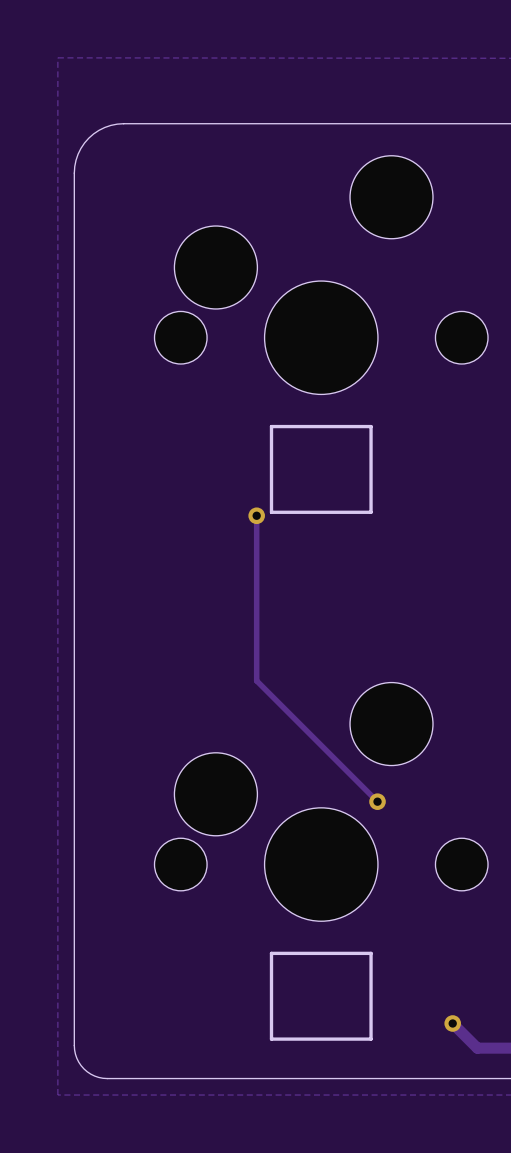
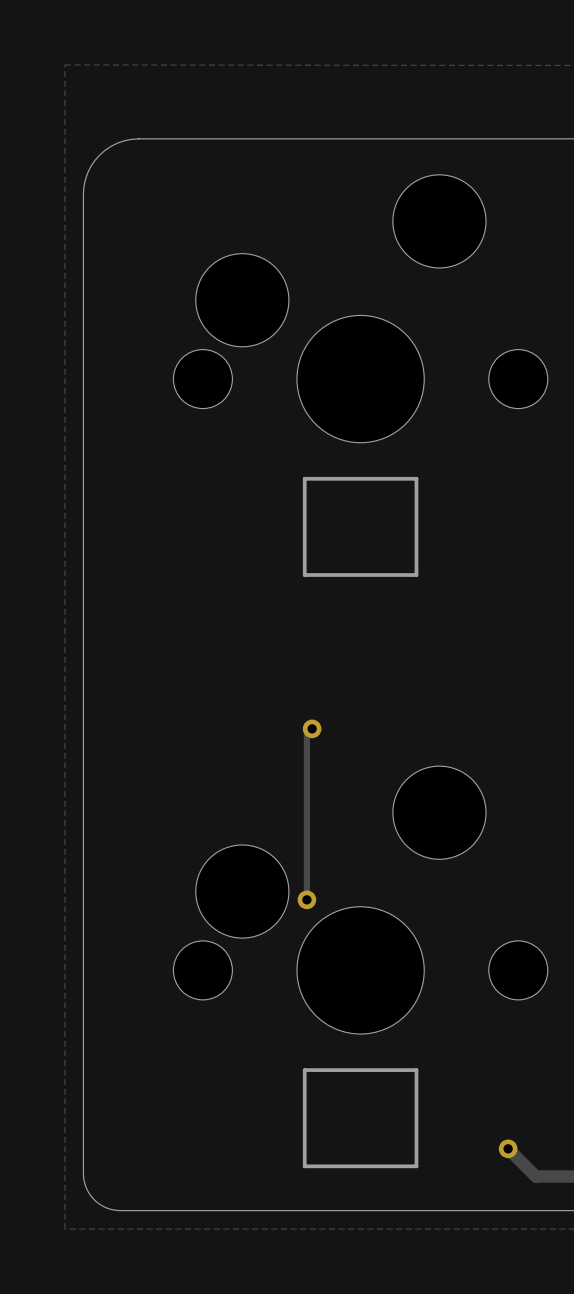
track: (256, 515) (256, 680) (377, 801) -> none
via: (256, 515) -> none
track: none -> (312, 728) (306, 734) (306, 899)
via: none -> (312, 728)
via: none -> (306, 899)
via: (377, 801) -> none

